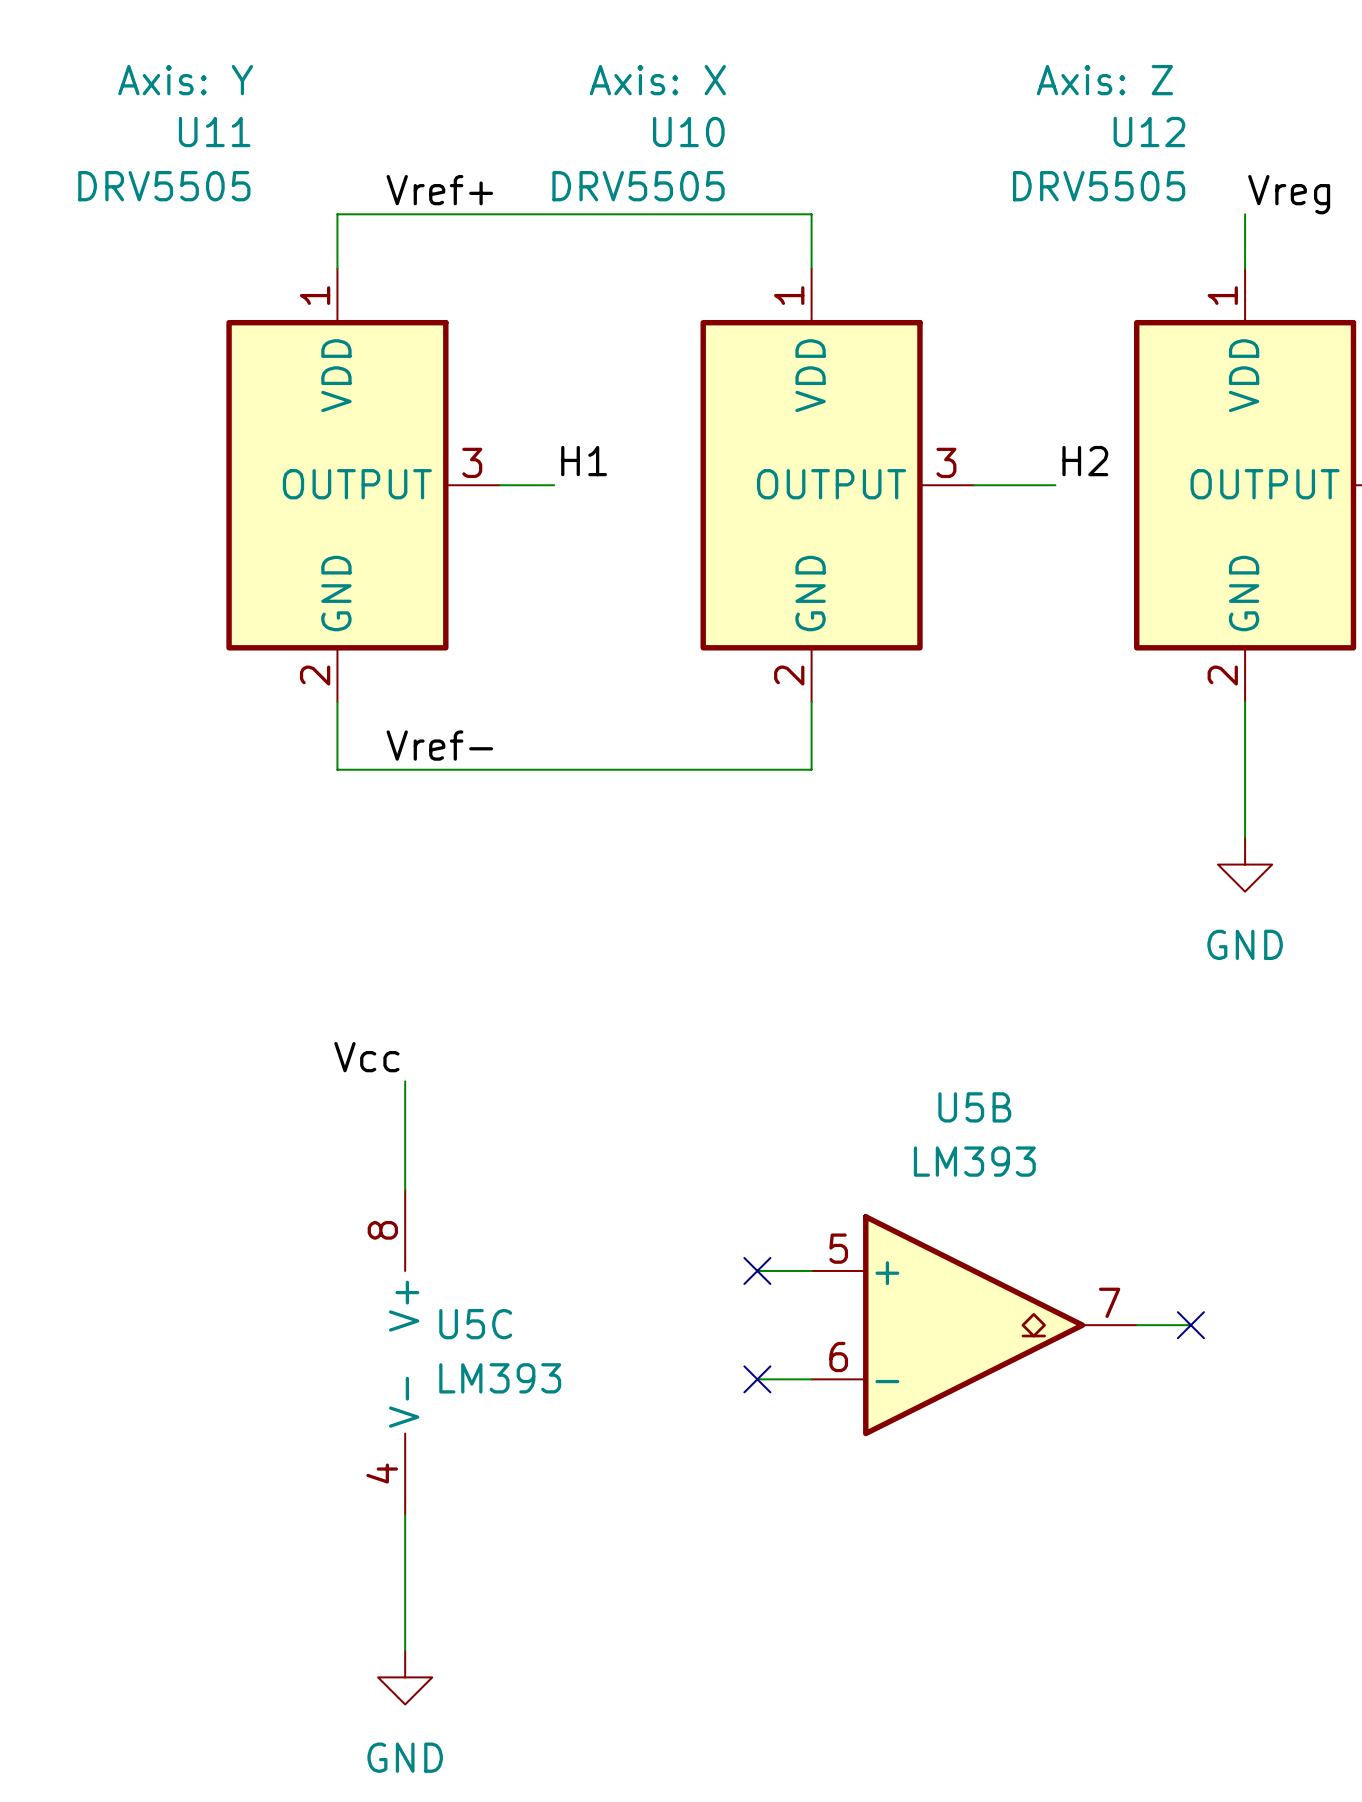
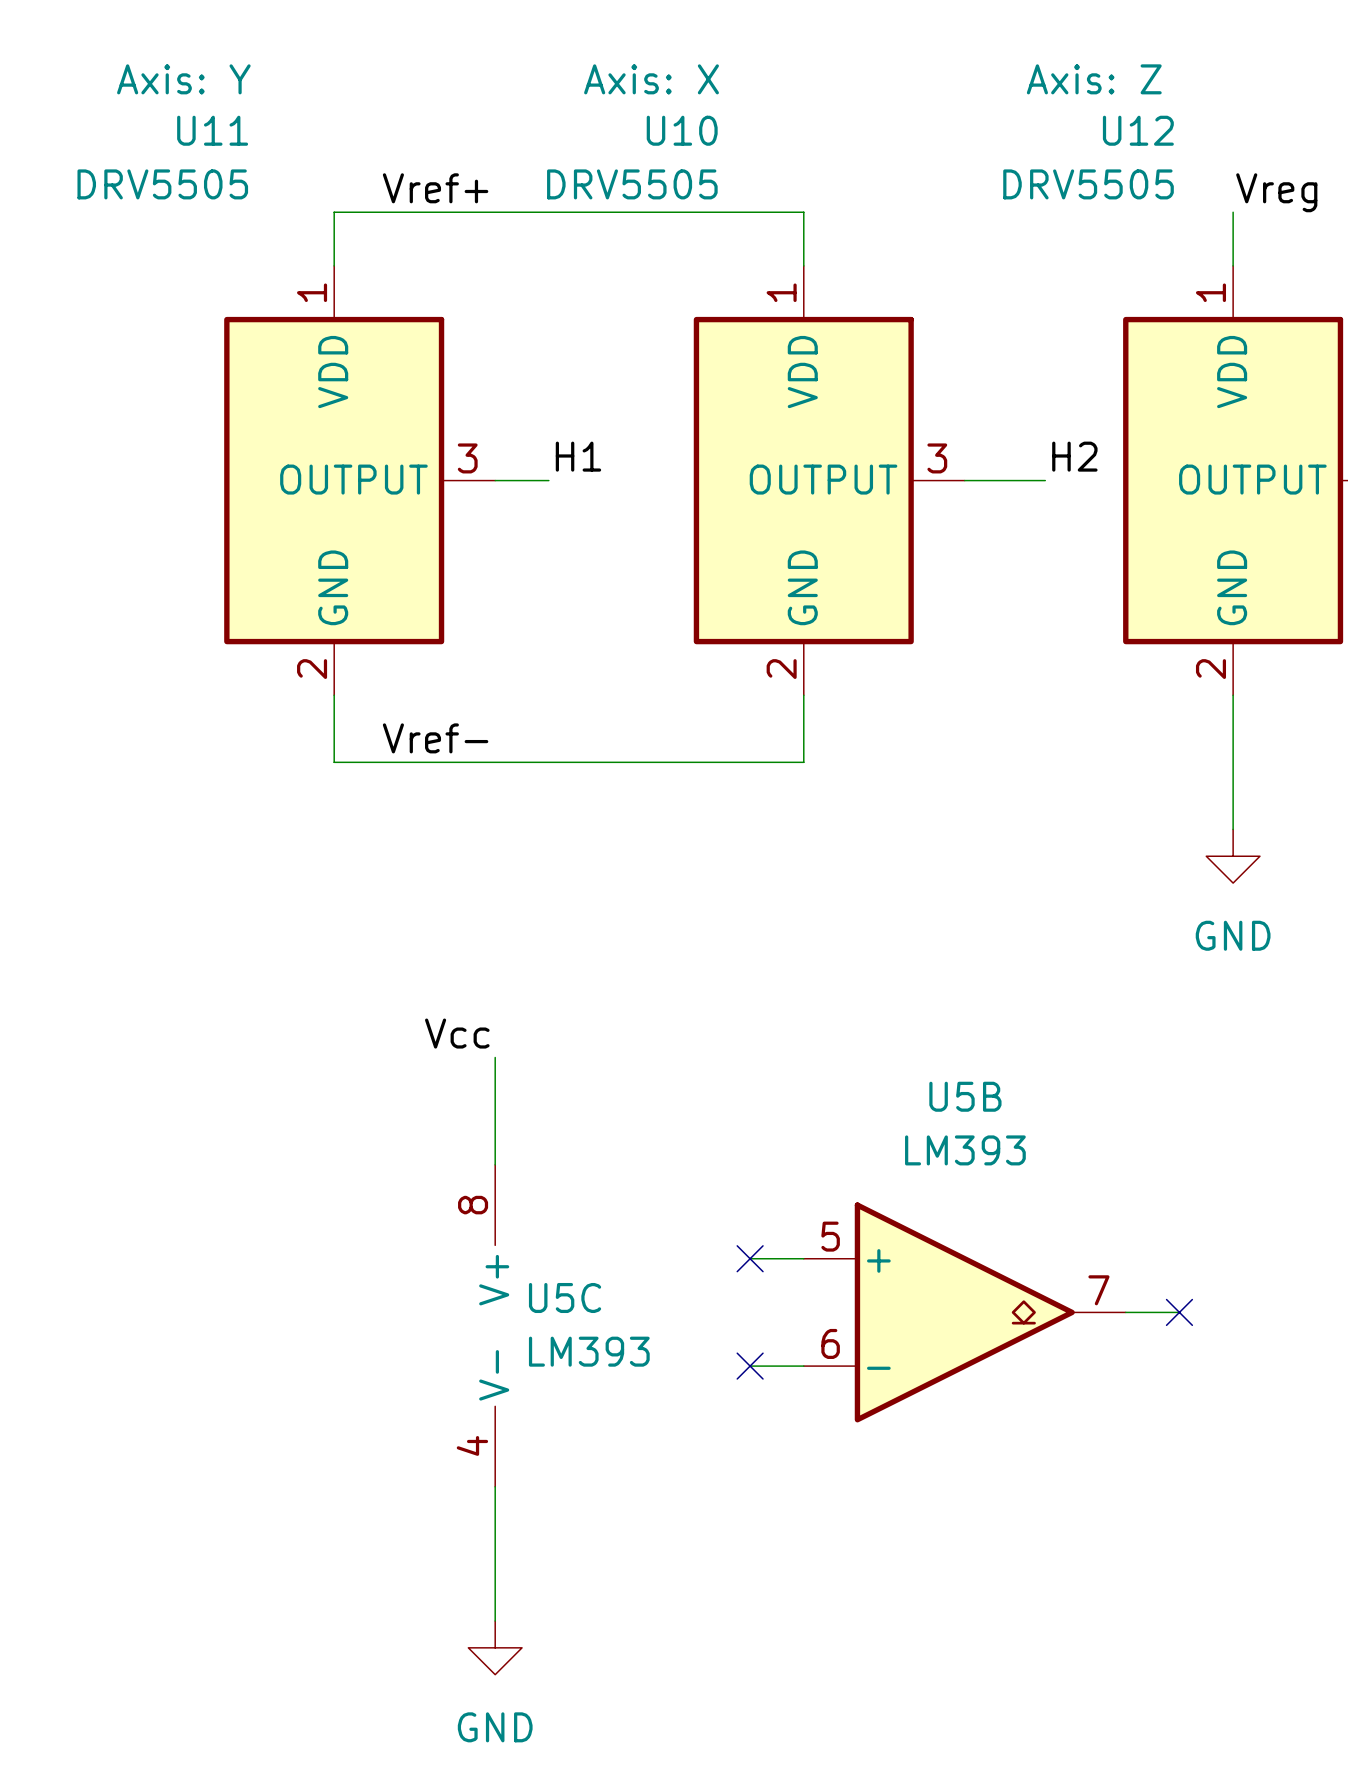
label position: Vcc (366, 1057) -> Vcc (457, 1033)
wire: (405, 1081) (405, 1189) -> (495, 1057) (495, 1164)
U5C position: (405, 1352) -> (495, 1325)
wire: (405, 1514) (405, 1650) -> (495, 1486) (495, 1621)
power symbol position: GND (405, 1677) -> GND (495, 1647)

